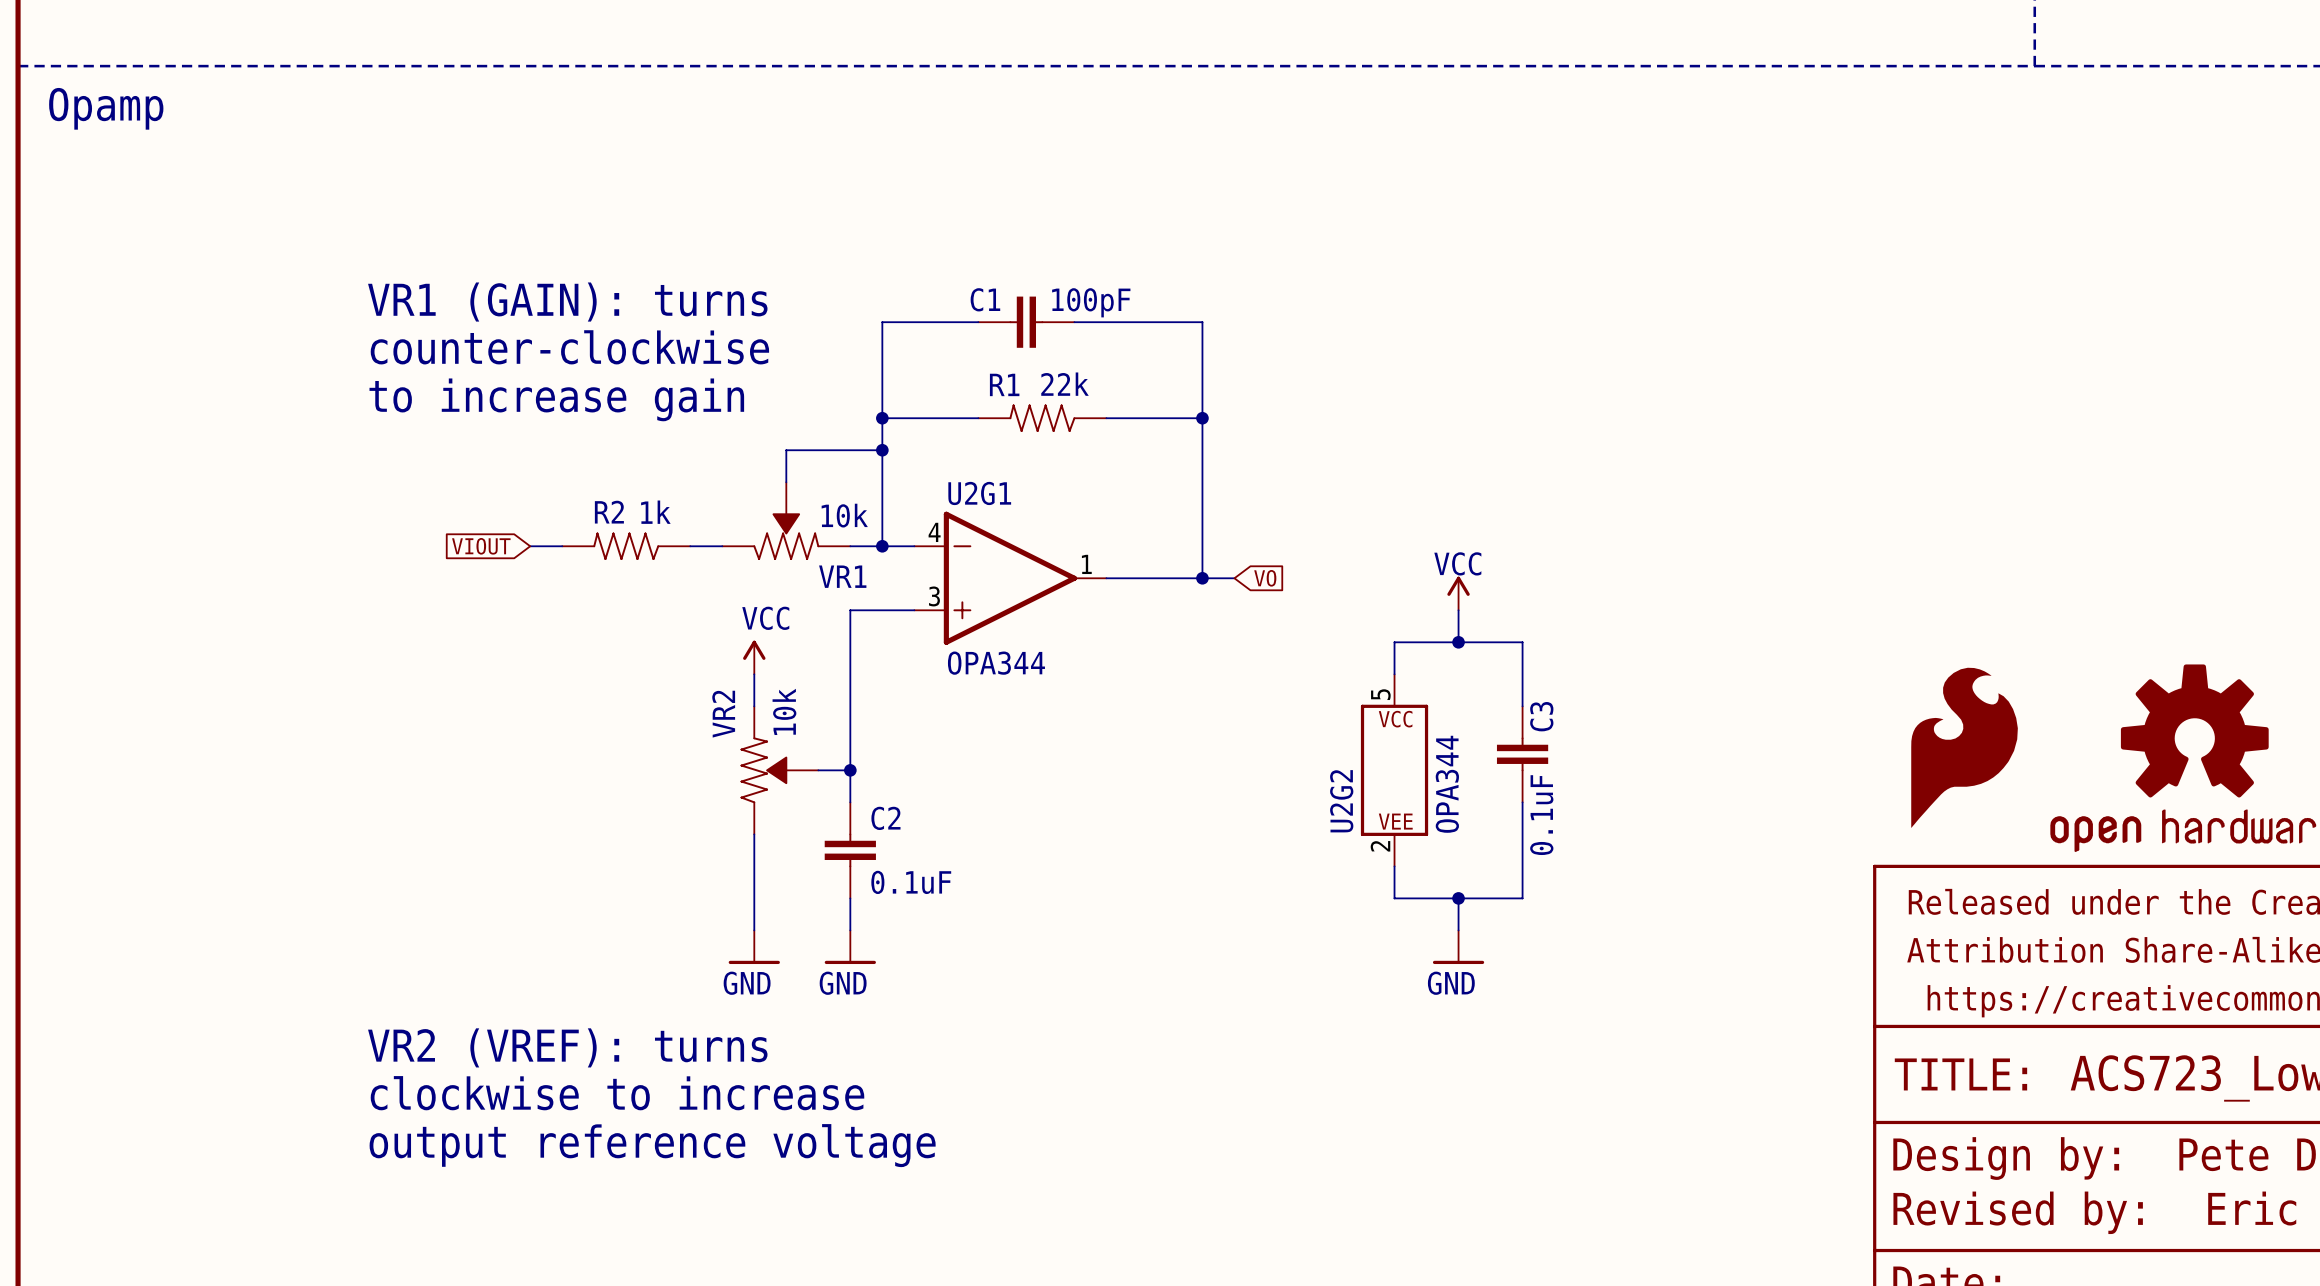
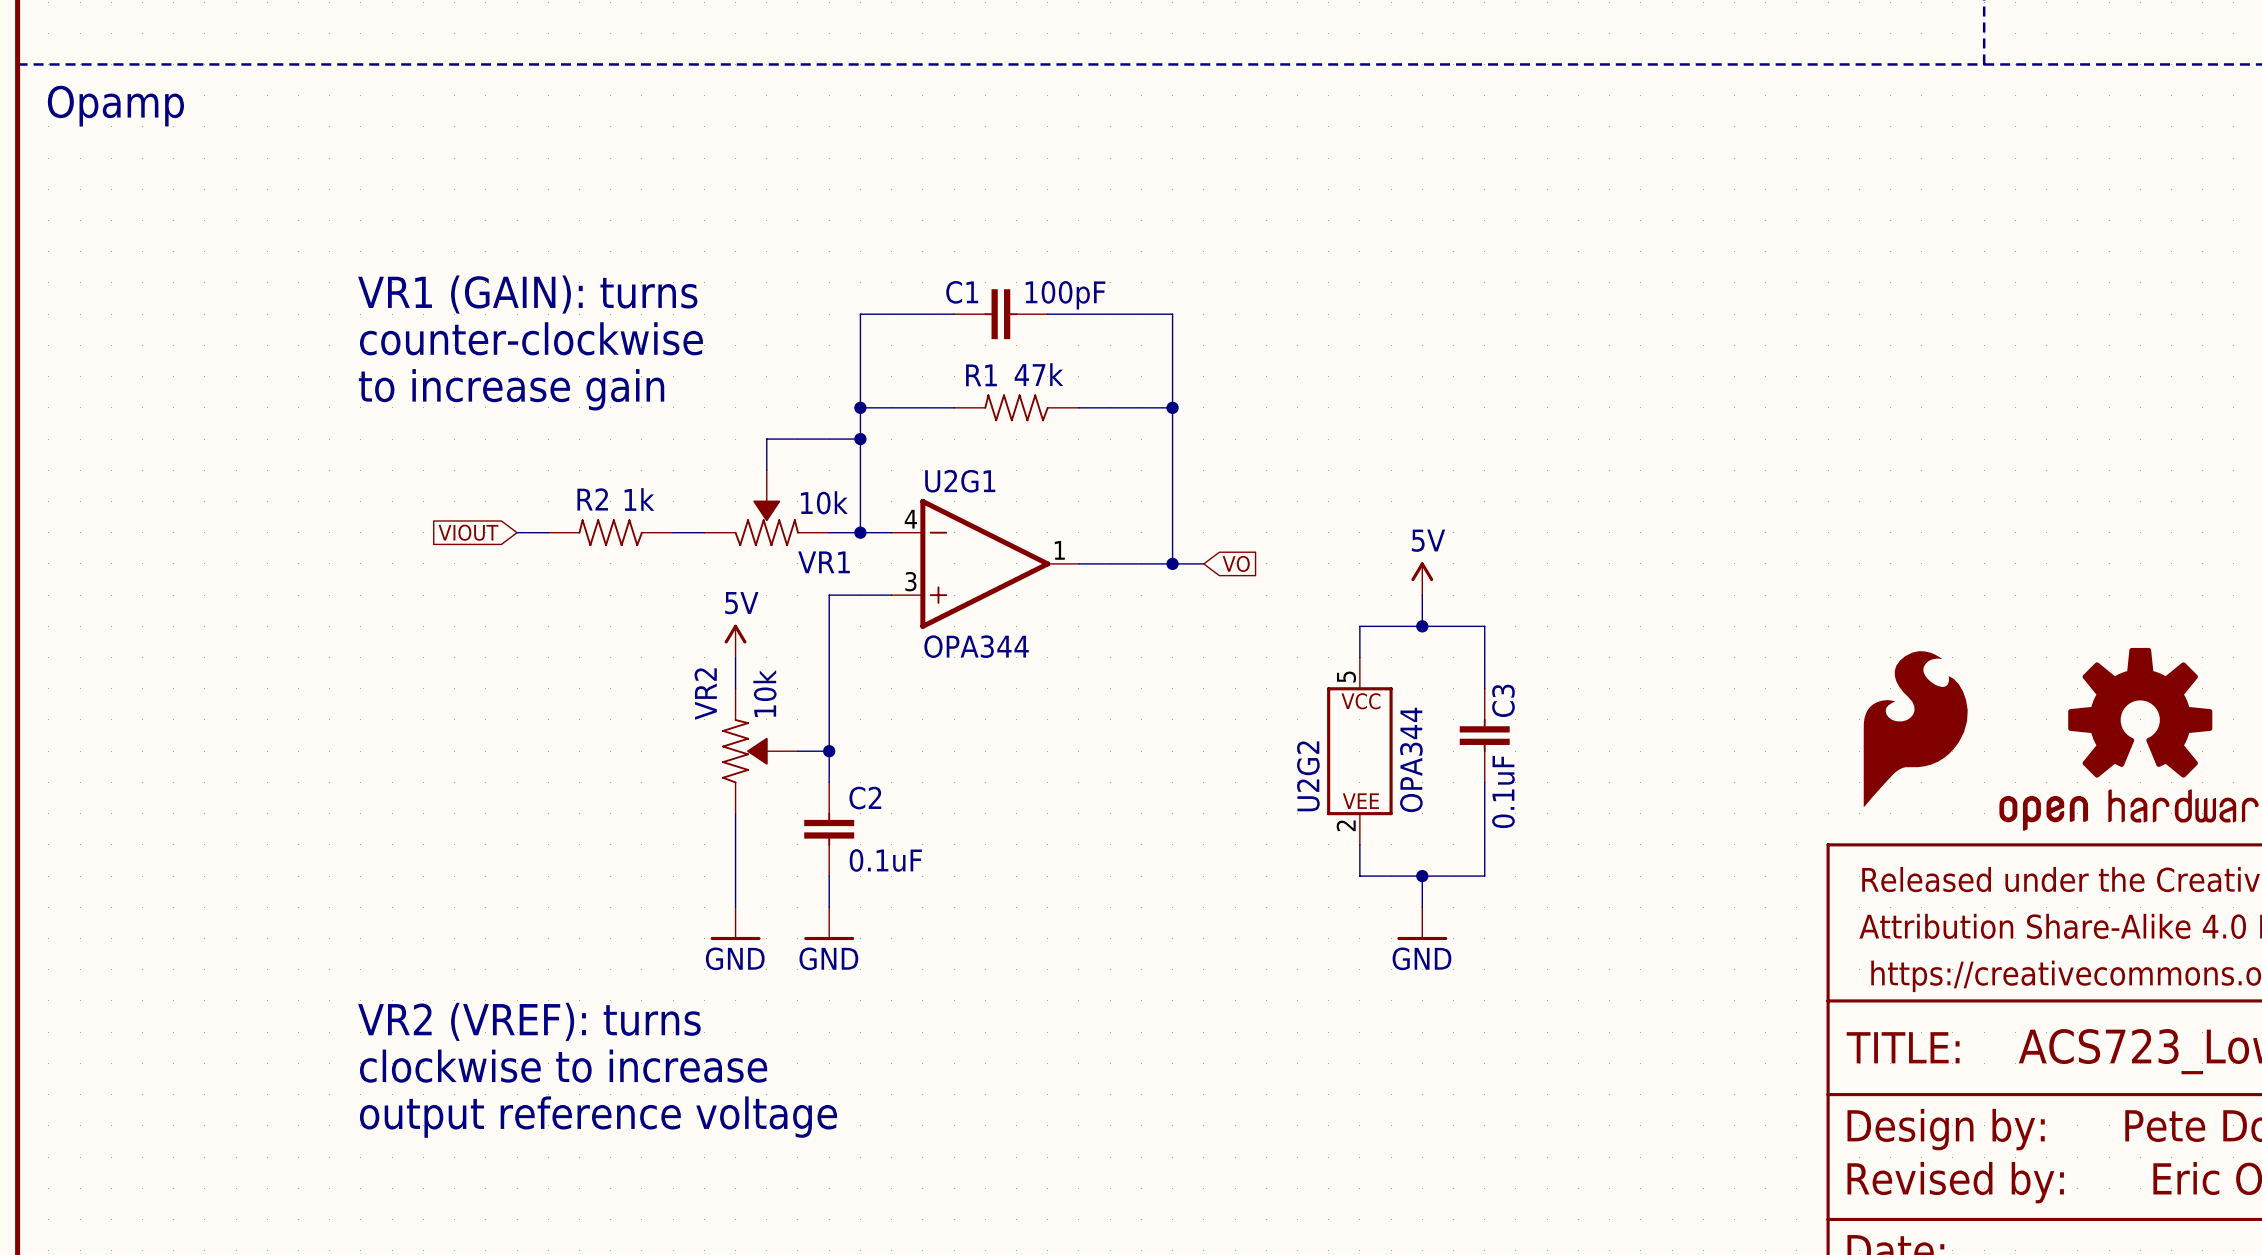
R1 value: 22k (1064, 384) -> 47k (1038, 374)
power symbol: VCC (1458, 593) -> 5V (1422, 578)
power symbol: VCC (754, 657) -> 5V (735, 641)

